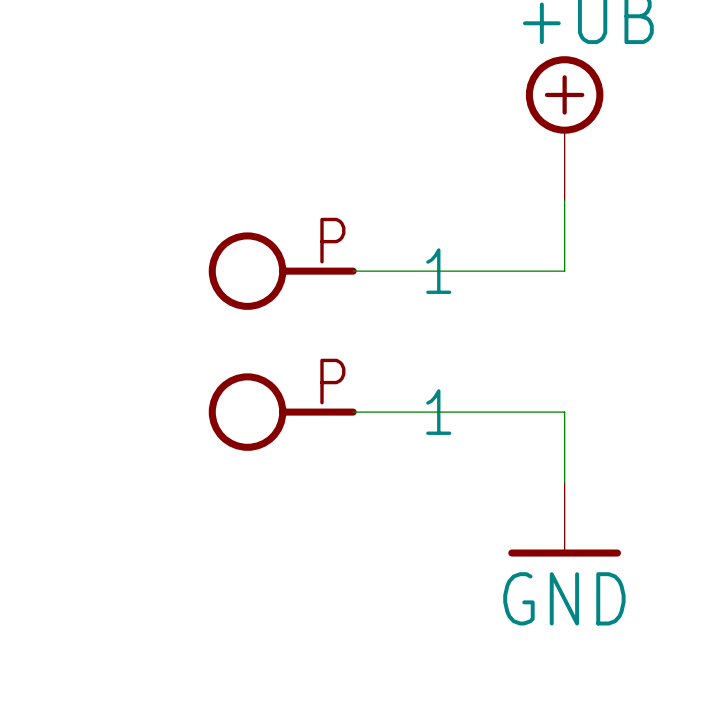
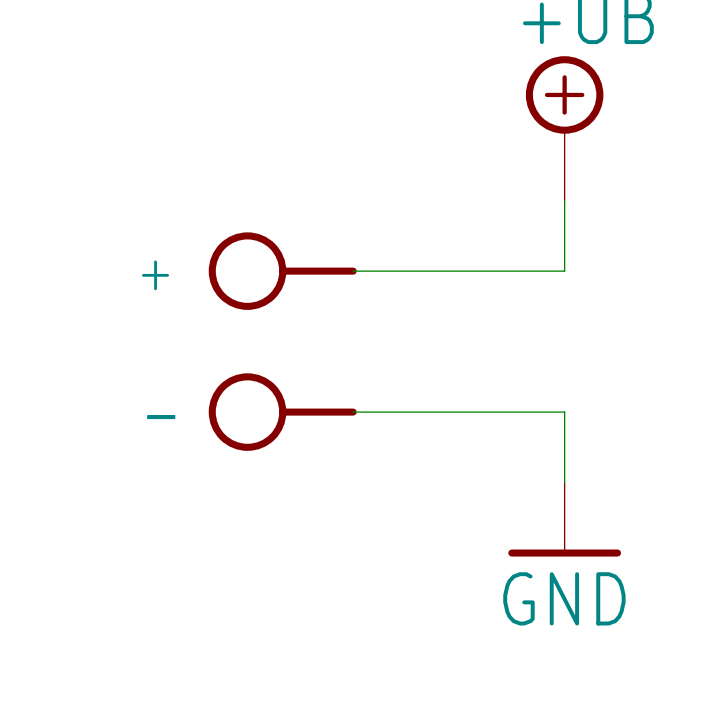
part pin number: P (332, 240) -> none
part pin name: 1 (438, 271) -> none
part name: none -> + (155, 275)
part pin number: P (332, 381) -> none
part pin name: 1 (438, 412) -> none
part name: none -> ̶̶ (161, 417)

